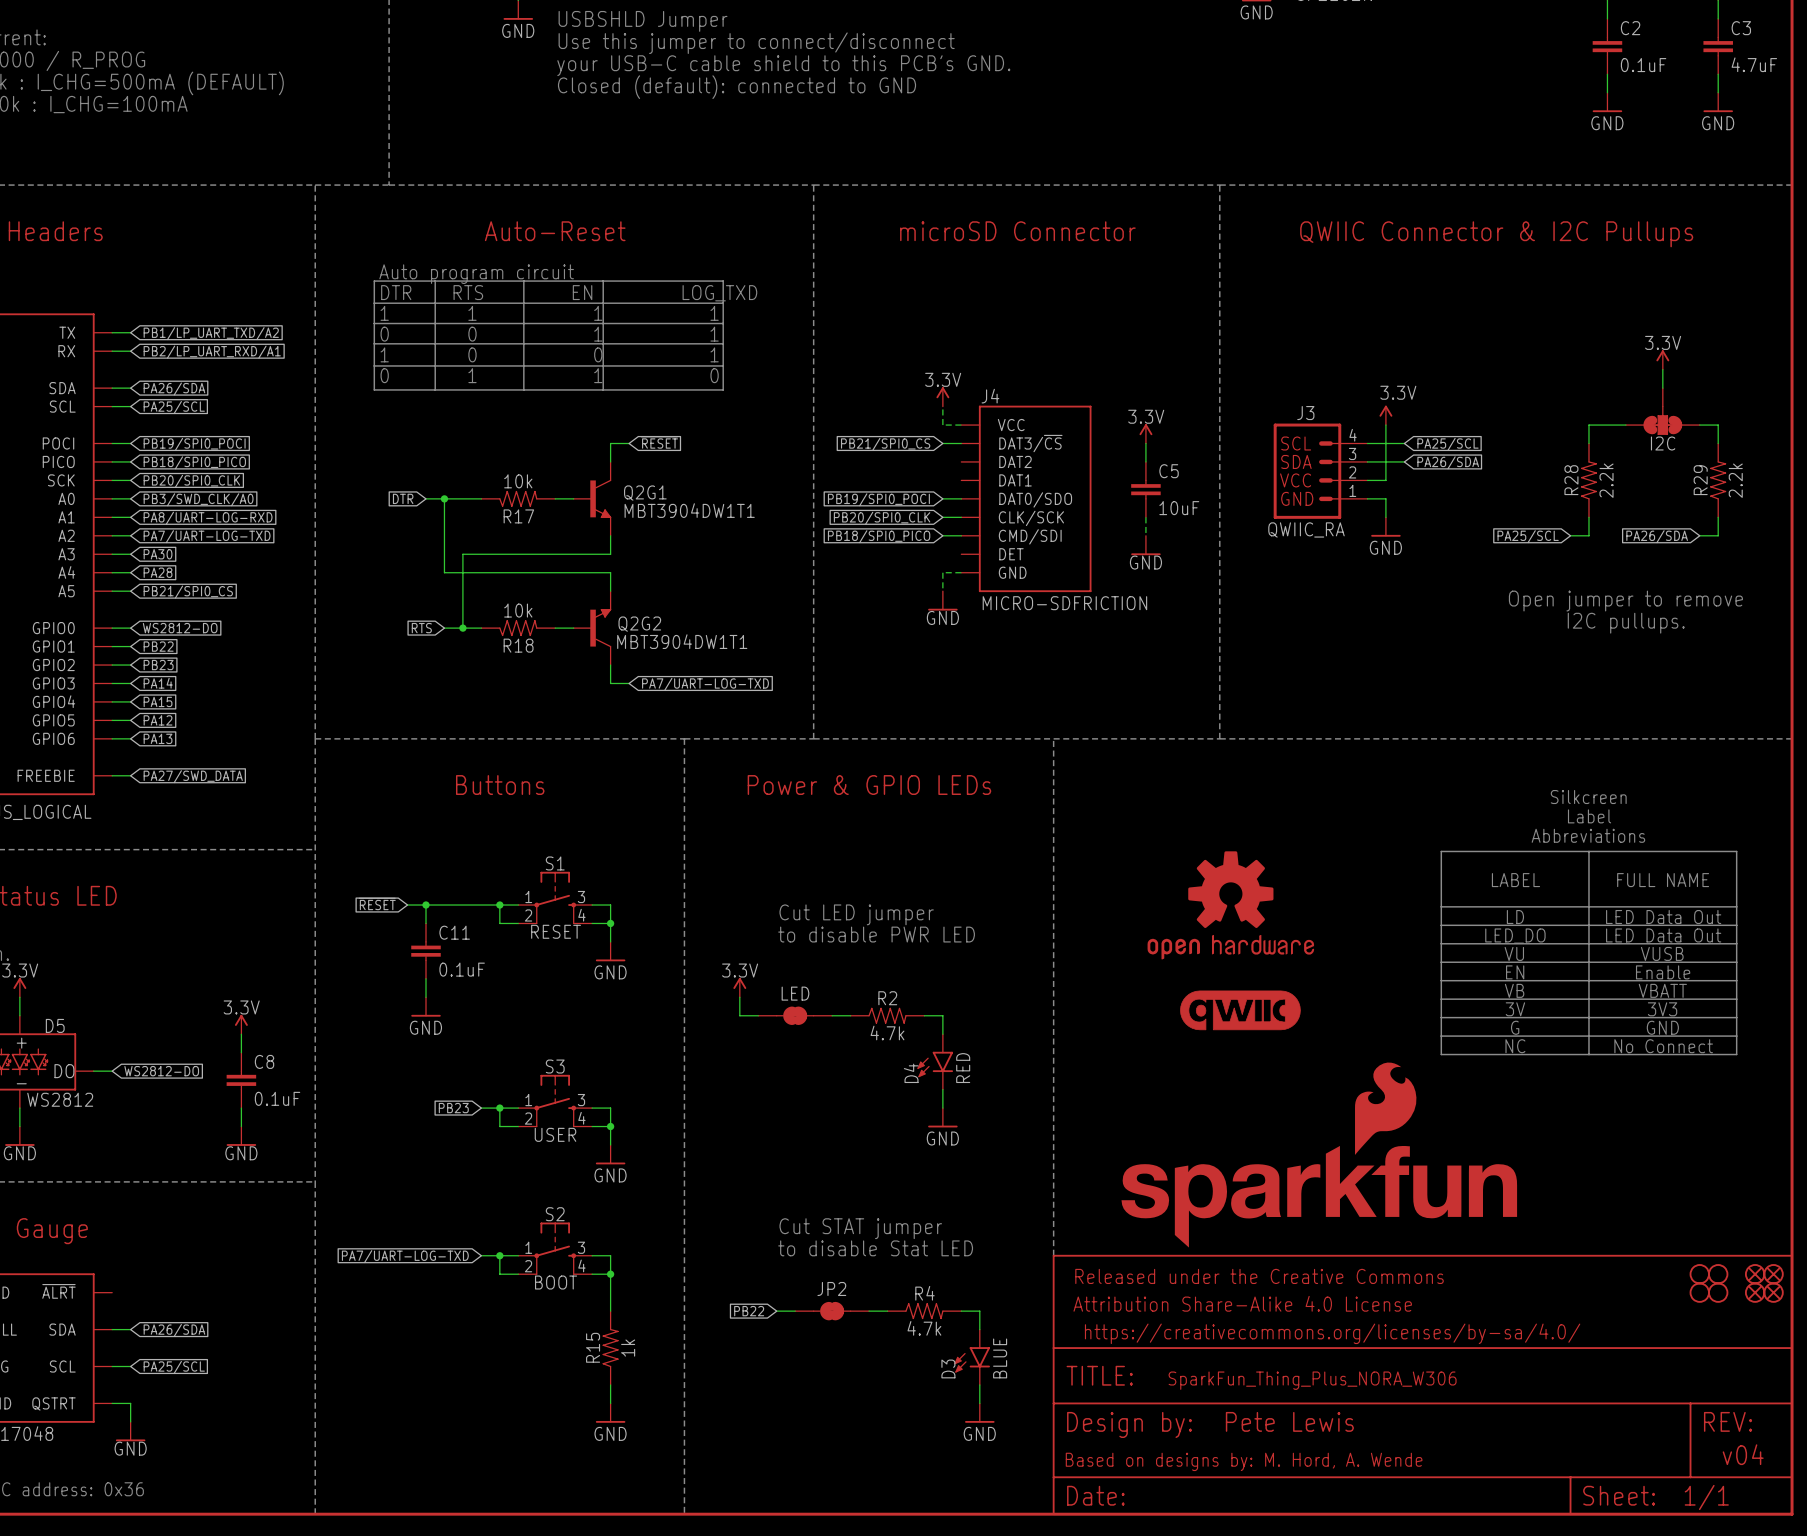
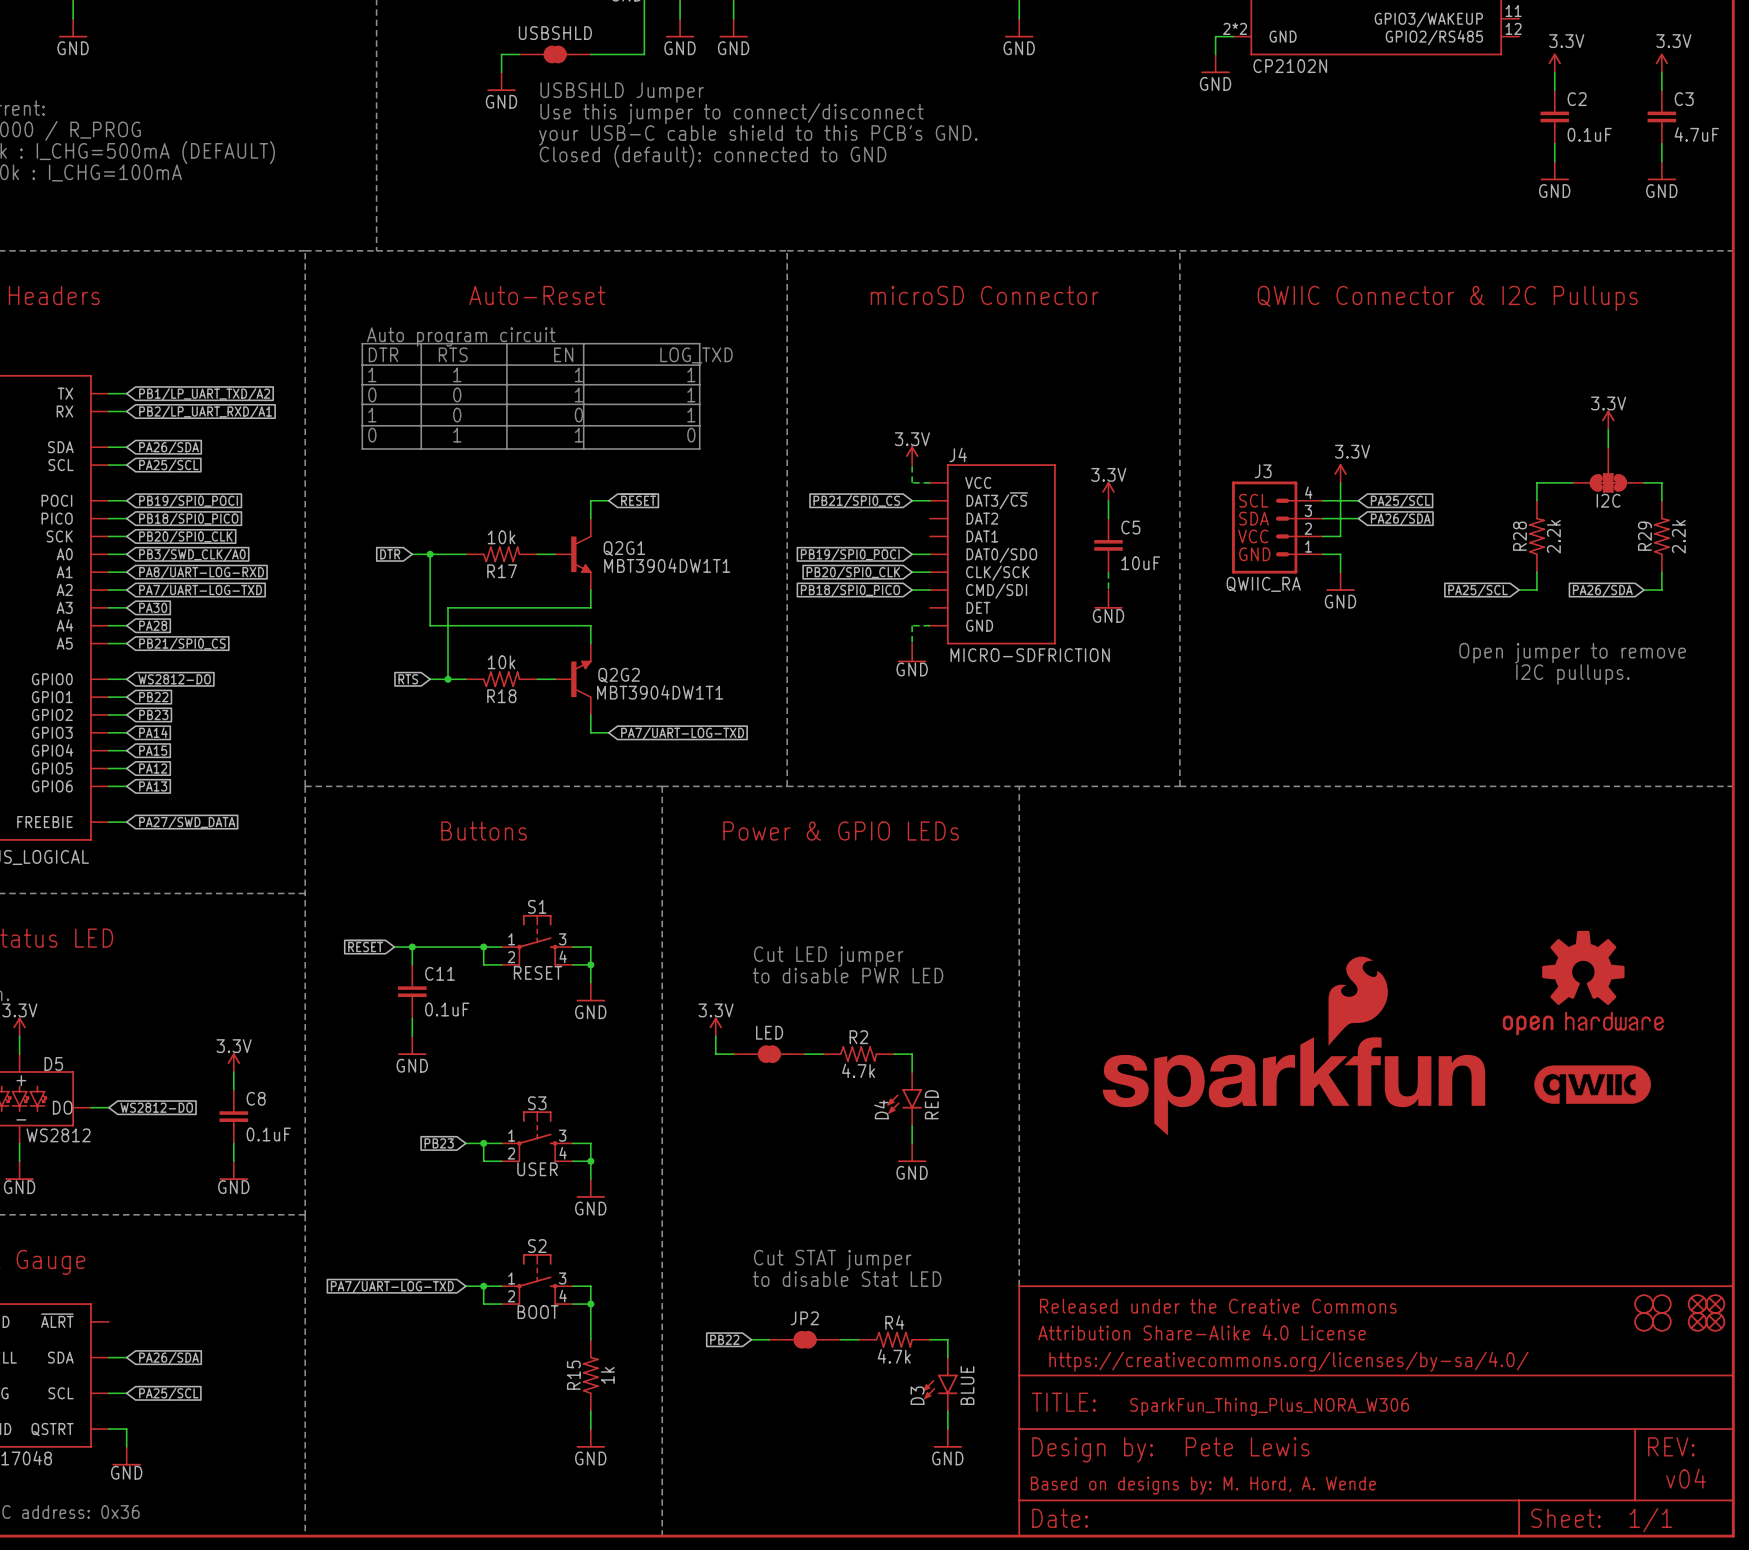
text: Silkcreen (1588, 797) -> none
text: Label (1589, 816) -> none
text: Abbreviations (1588, 835) -> none
line: (1441, 851) (1441, 1054) (1736, 1054) (1736, 851) (1441, 851) -> none
line: (1588, 851) (1588, 1054) -> none
text: LABEL (1515, 880) -> none
text: FULL NAME (1663, 880) -> none
part: (1230, 905) -> none
line: (1441, 906) (1736, 906) -> none
text: LD (1515, 917) -> none
text: LED Data Out (1663, 917) -> none
line: (1441, 925) (1736, 925) -> none
text: LED Data Out (1663, 935) -> none
text: LED_DO (1515, 936) -> none
part: none -> (1583, 983)
line: (1441, 943) (1736, 943) -> none
text: VU (1514, 953) -> none
text: VUSB (1662, 953) -> none
line: (1441, 962) (1736, 962) -> none
text: EN (1515, 972) -> none
text: Enable (1663, 972) -> none
line: (1441, 980) (1736, 980) -> none
text: VB (1514, 990) -> none
text: VBATT (1662, 990) -> none
line: (1441, 999) (1736, 999) -> none
text: 3V (1515, 1009) -> none
text: 3V3 (1662, 1009) -> none
part: (1240, 1010) -> none
line: (1441, 1017) (1736, 1017) -> none
text: G (1515, 1027) -> none
text: GND (1662, 1027) -> none
line: (1441, 1036) (1736, 1036) -> none
text: NC (1515, 1046) -> none
text: No Connect (1663, 1046) -> none
part: none -> (1592, 1084)
part position: (1319, 1155) -> (1293, 1046)

